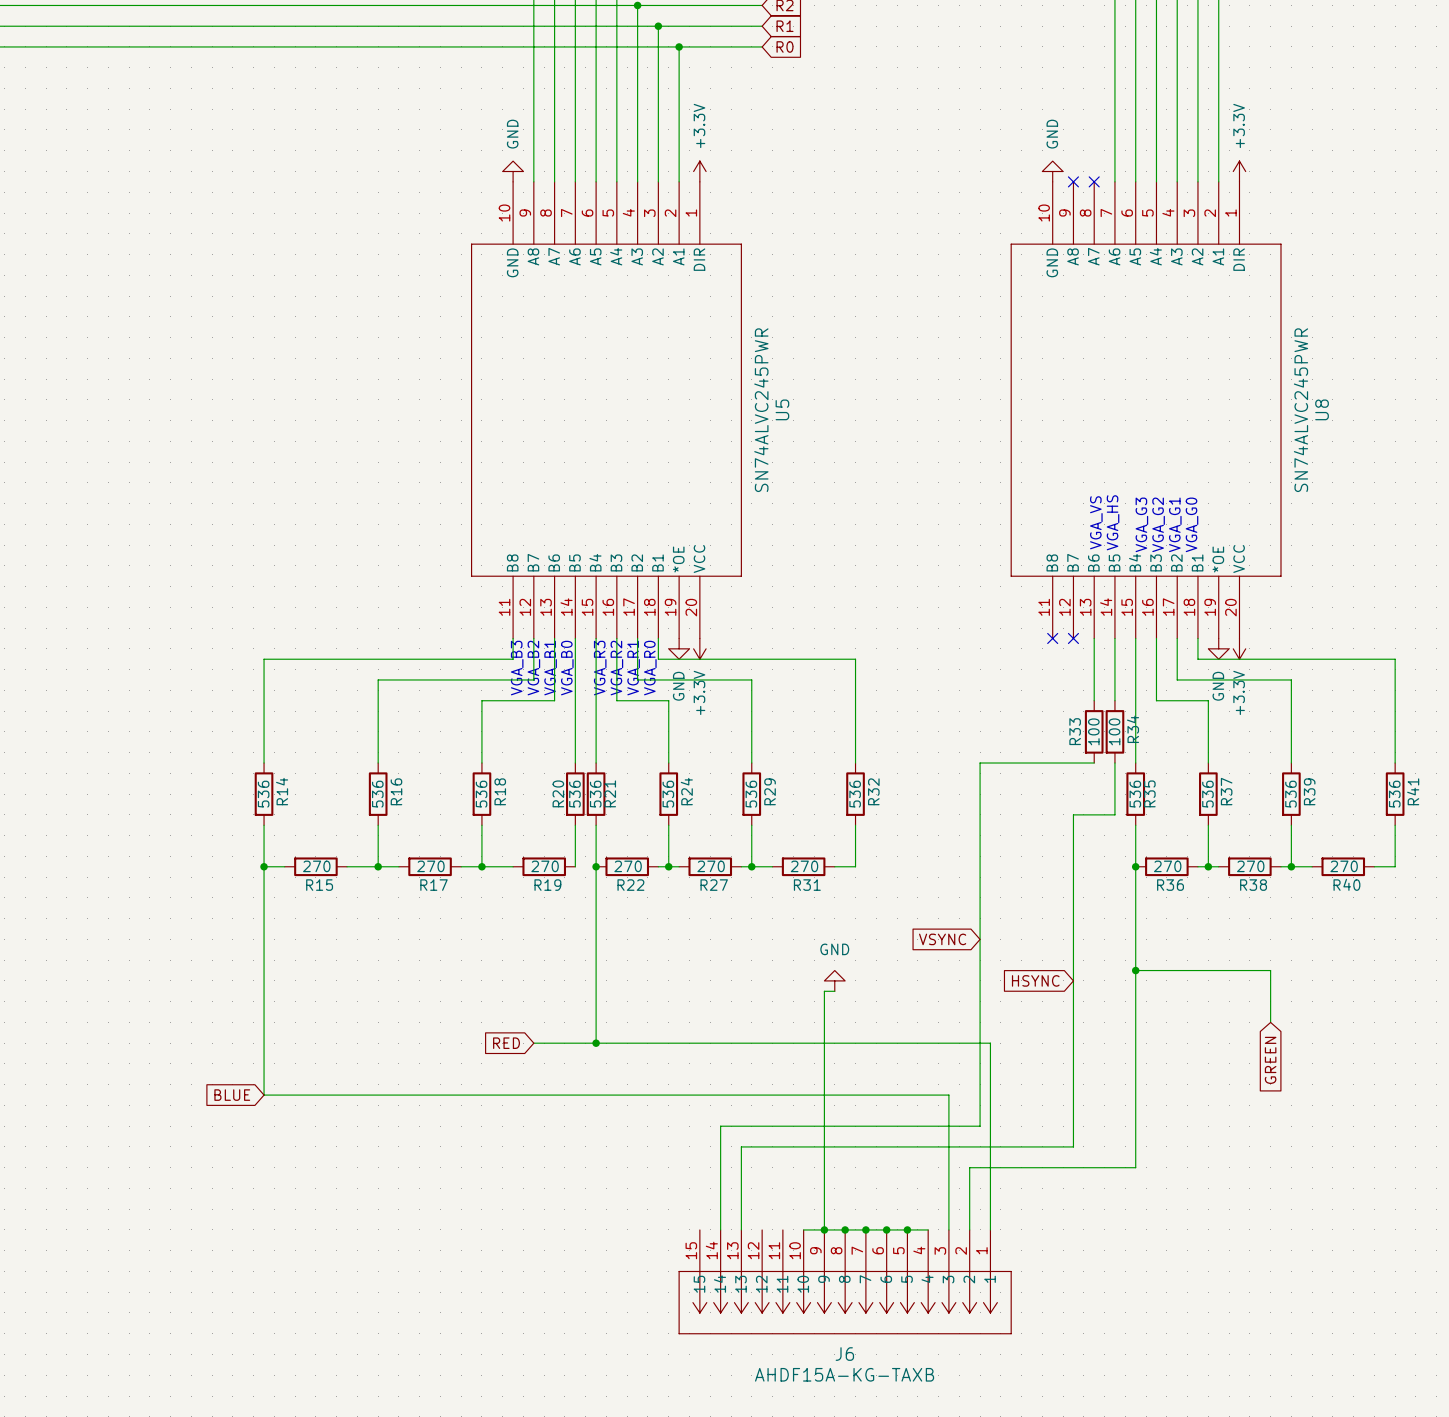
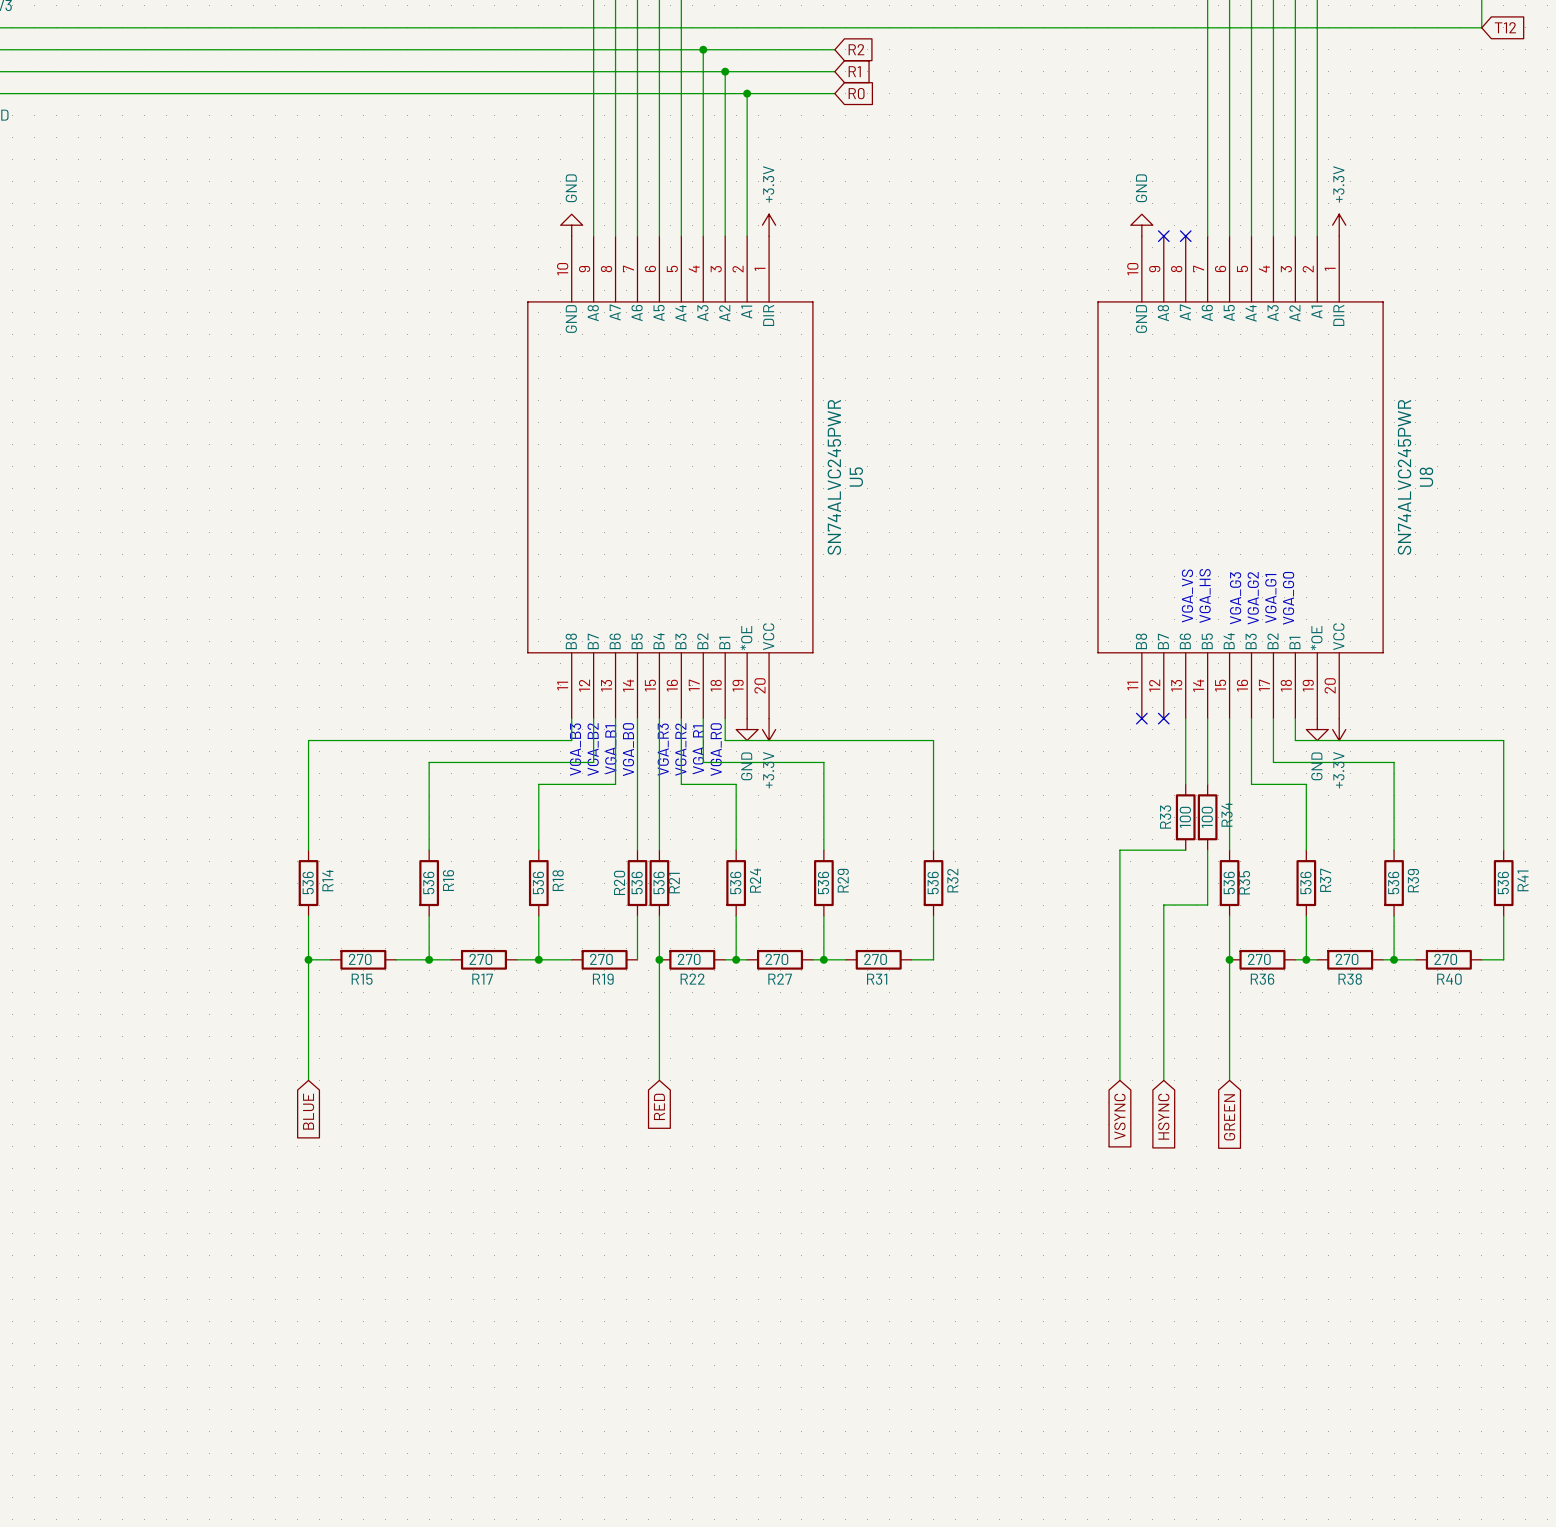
wire: (1031, 763) (980, 763) (980, 1126) (720, 1126) (720, 1229) -> (1119, 850) (1119, 1080)
global label rotation: 0° (942, 939) -> 90° counterclockwise (1119, 1116)
global label position: VSYNC (942, 939) -> VSYNC (1119, 1116)
wire: (1135, 970) (1270, 970) (1270, 1022) -> none
junction: (1135, 970) -> none
wire: (264, 980) (264, 1095) (948, 1095) (948, 1229) -> none
wire: (596, 980) (596, 1043) -> none
power symbol: GND (834, 980) -> none
global label rotation: 0° (1035, 980) -> 90° counterclockwise (1163, 1116)
wire: (1073, 980) (1073, 1146) (741, 1146) (741, 1229) -> none
wire: (1135, 980) (1135, 1167) (969, 1167) (969, 1229) -> none
wire: (834, 991) (824, 991) (824, 1229) -> none
global label rotation: 0° (506, 1043) -> 90° counterclockwise (659, 1106)
global label position: RED (506, 1043) -> RED (659, 1106)
wire: (533, 1043) (990, 1043) (990, 1229) -> none
junction: (596, 1043) -> none
global label position: GREEN (1270, 1060) -> GREEN (1229, 1117)
global label rotation: 0° (232, 1095) -> 90° counterclockwise (308, 1111)
global label position: BLUE (232, 1095) -> BLUE (308, 1111)
wire: (803, 1229) (928, 1229) -> none
junction: (824, 1229) -> none
junction: (845, 1229) -> none
junction: (865, 1229) -> none
junction: (886, 1229) -> none
junction: (907, 1229) -> none
J6: AHDF15A-KG-TAXB (845, 1282) -> none

